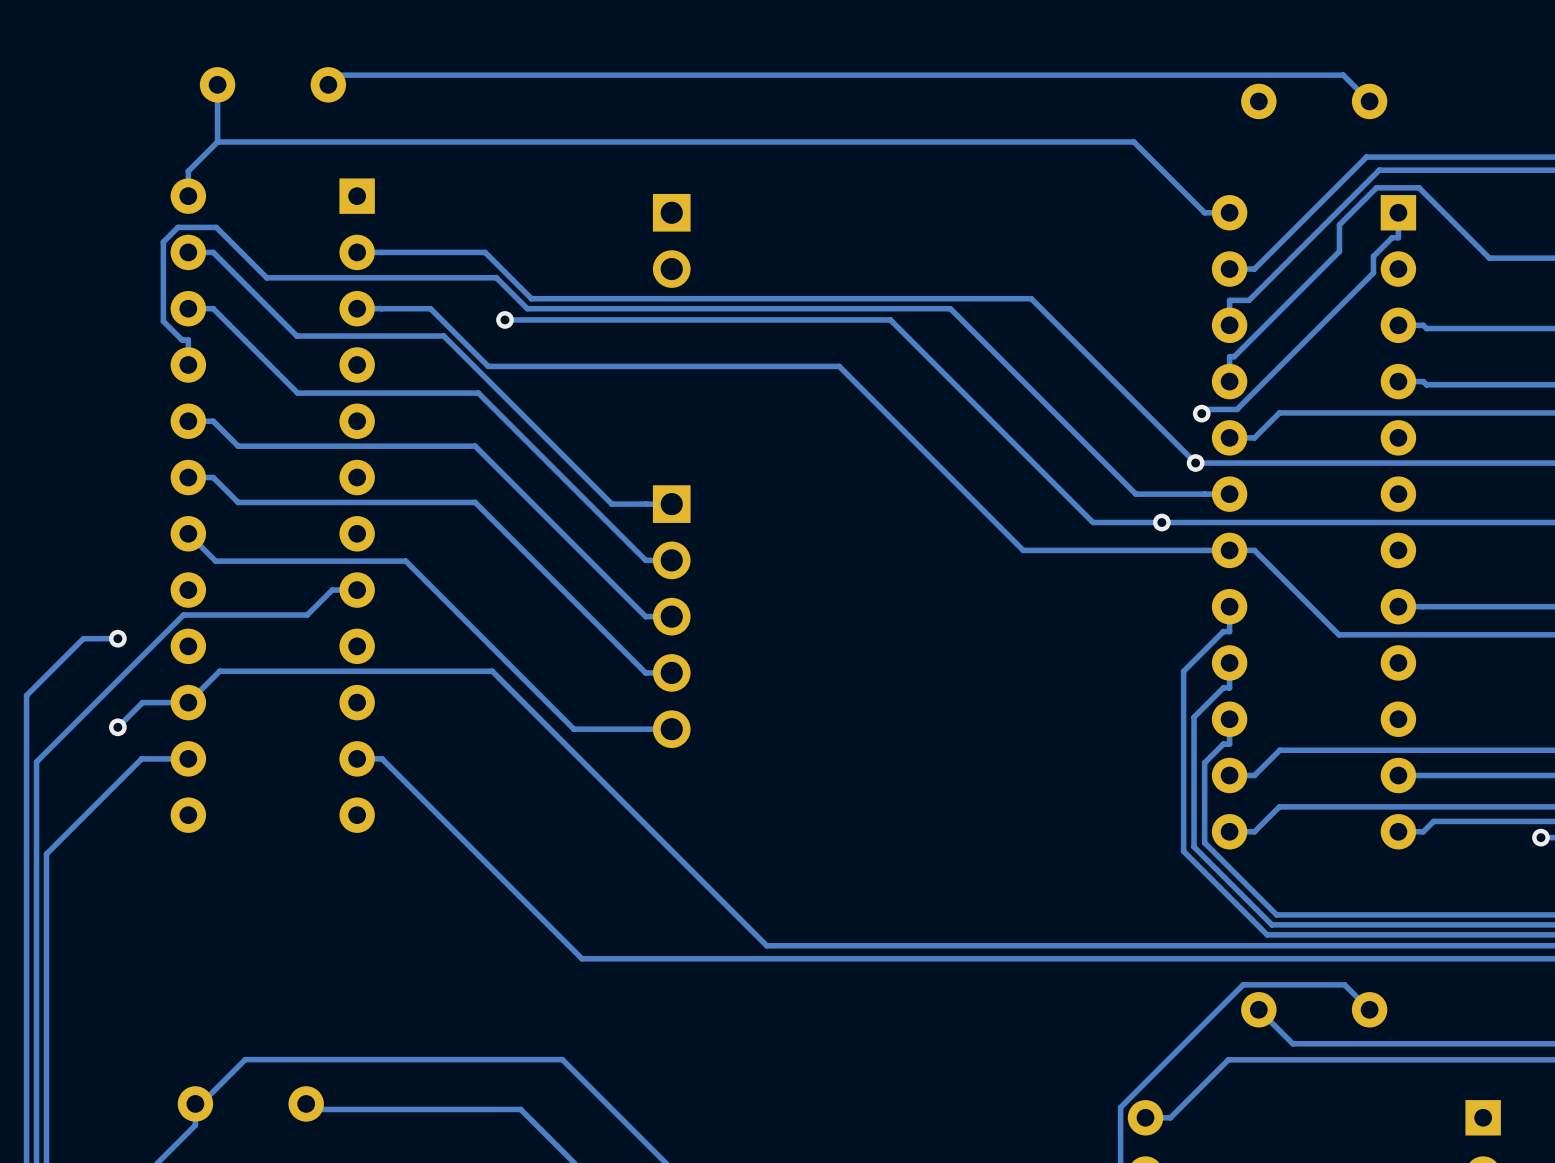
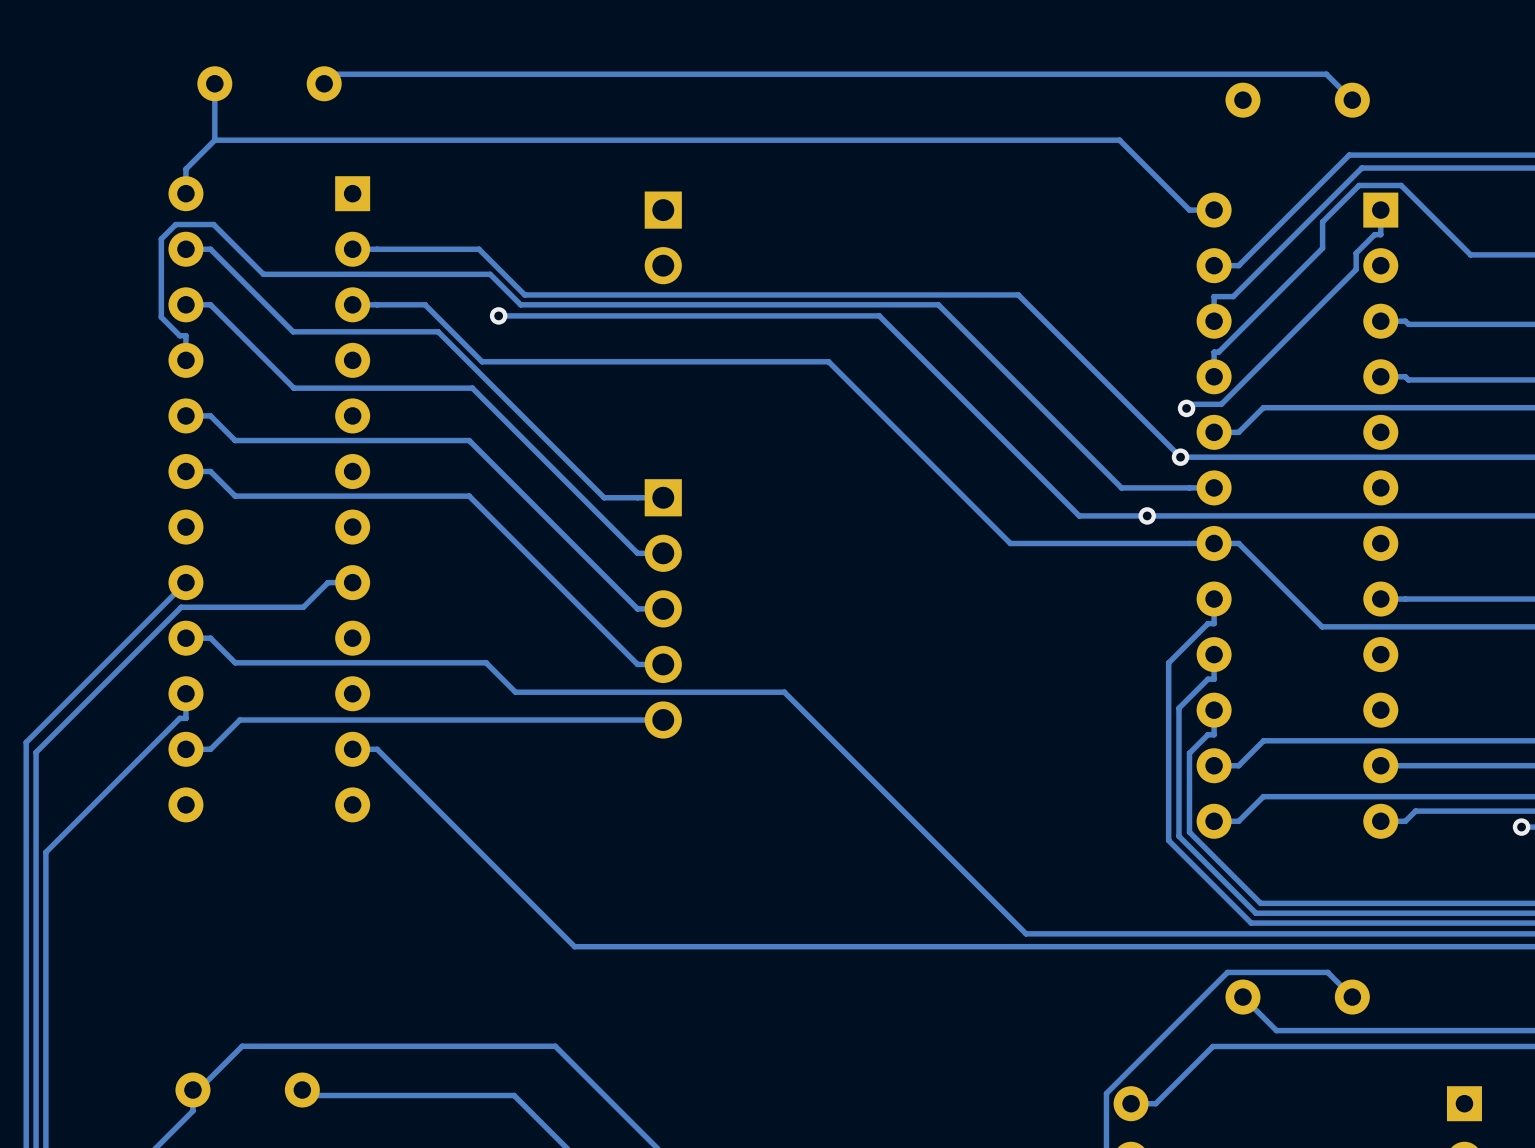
track: (188, 533) (215, 561) (405, 561) (573, 729) -> (185, 749) (210, 749) (239, 720) (566, 720)
track: (117, 638) (83, 638) (26, 695) (26, 751) -> (185, 582) (26, 742)
via: (117, 638) -> none
track: (238, 671) (219, 671) (188, 702) (142, 702) (117, 727) -> (235, 662) (210, 638) (185, 638)
track: (522, 701) (766, 945) (1039, 945) -> (515, 692) (784, 692) (1026, 933)
via: (117, 727) -> none
track: (188, 758) (141, 758) (46, 854) (46, 863) -> (185, 693) (185, 718) (179, 718) (45, 852)

